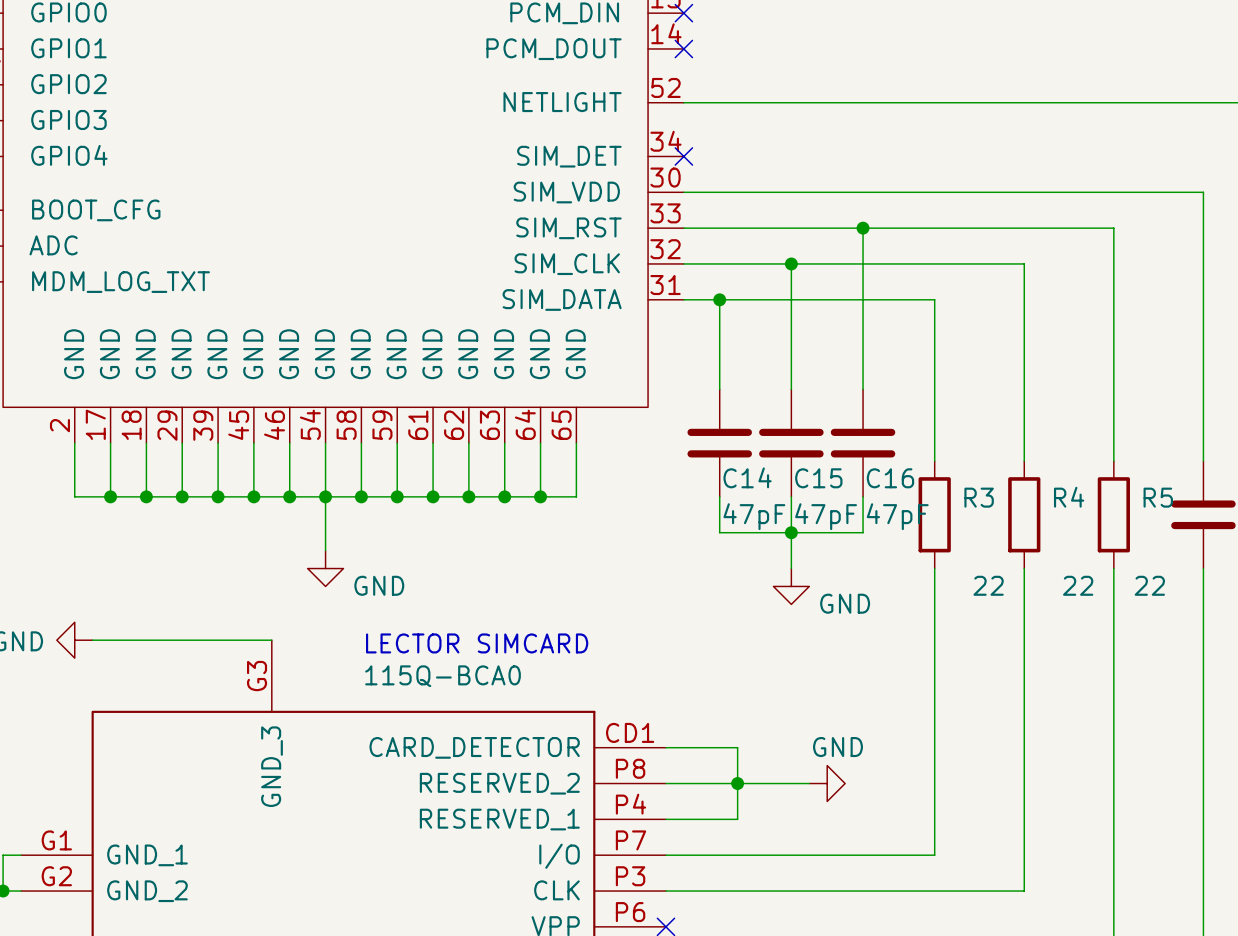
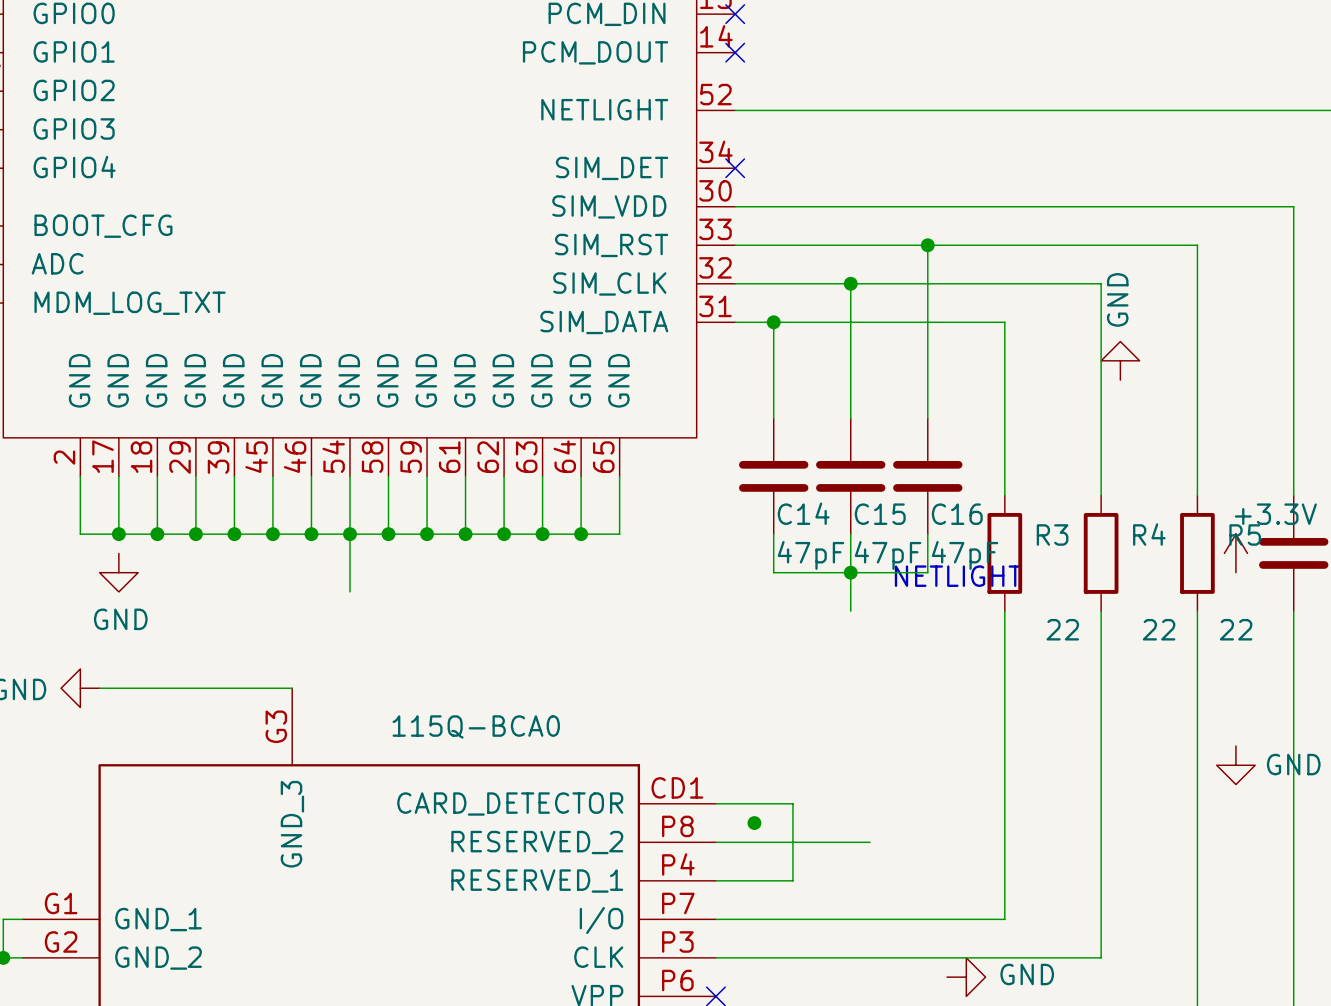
power symbol: none -> GND (1120, 360)
power symbol: none -> +3.3V (1235, 553)
text: none -> NETLIGHT (958, 576)
power symbol position: GND (325, 568) -> GND (118, 572)
power symbol text position: GND (379, 585) -> GND (120, 619)
power symbol: GND (791, 586) -> none
text: LECTOR SIMCARD (477, 643) -> none
power symbol: none -> GND (1235, 765)
junction position: (737, 783) -> (754, 823)
power symbol: GND (827, 783) -> none
power symbol: none -> GND (966, 977)

